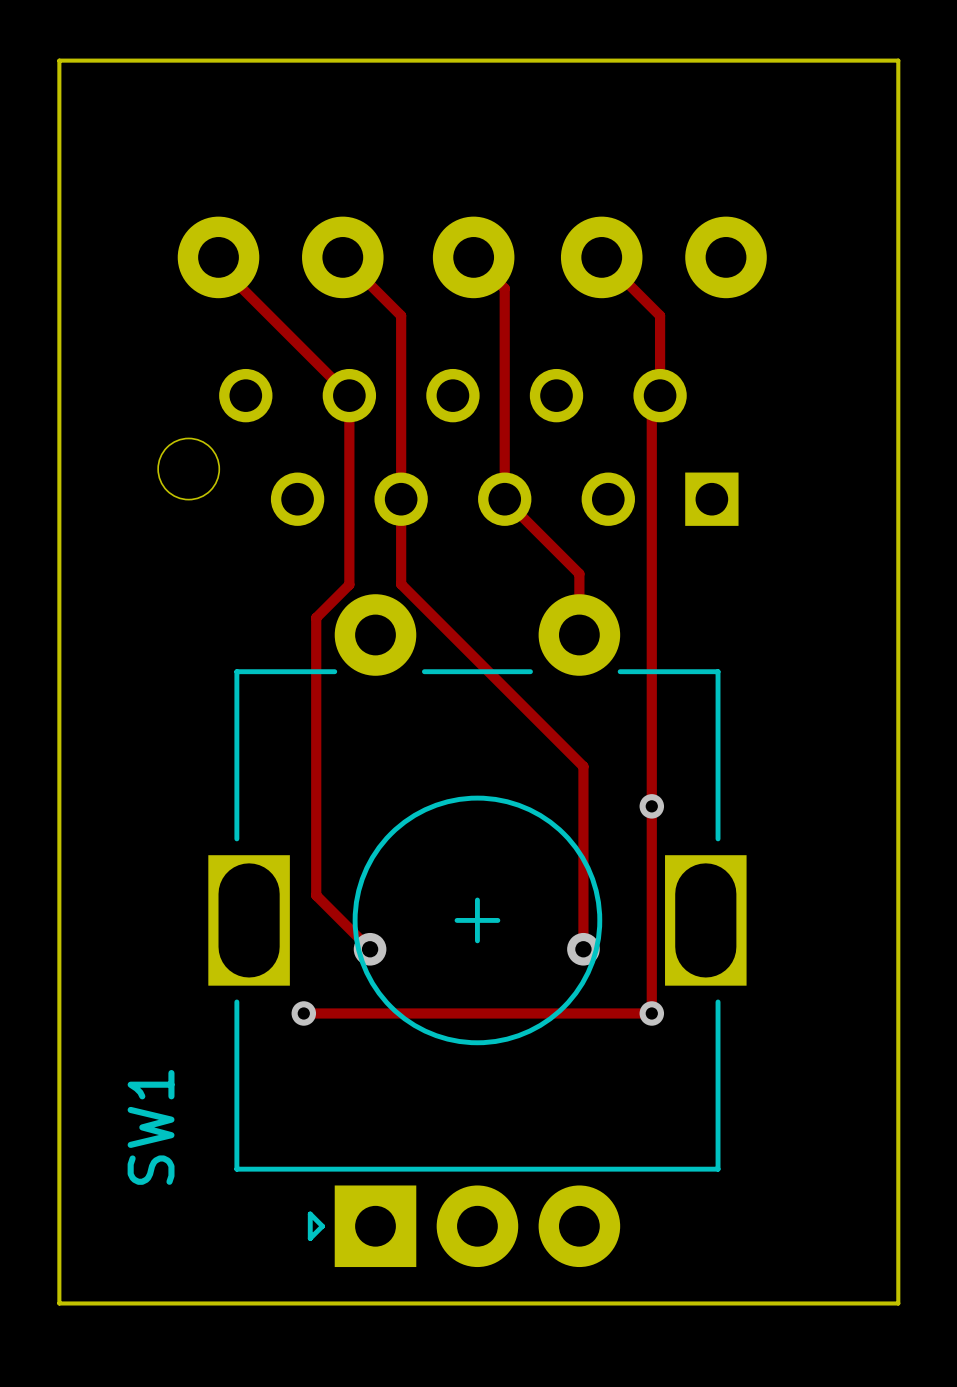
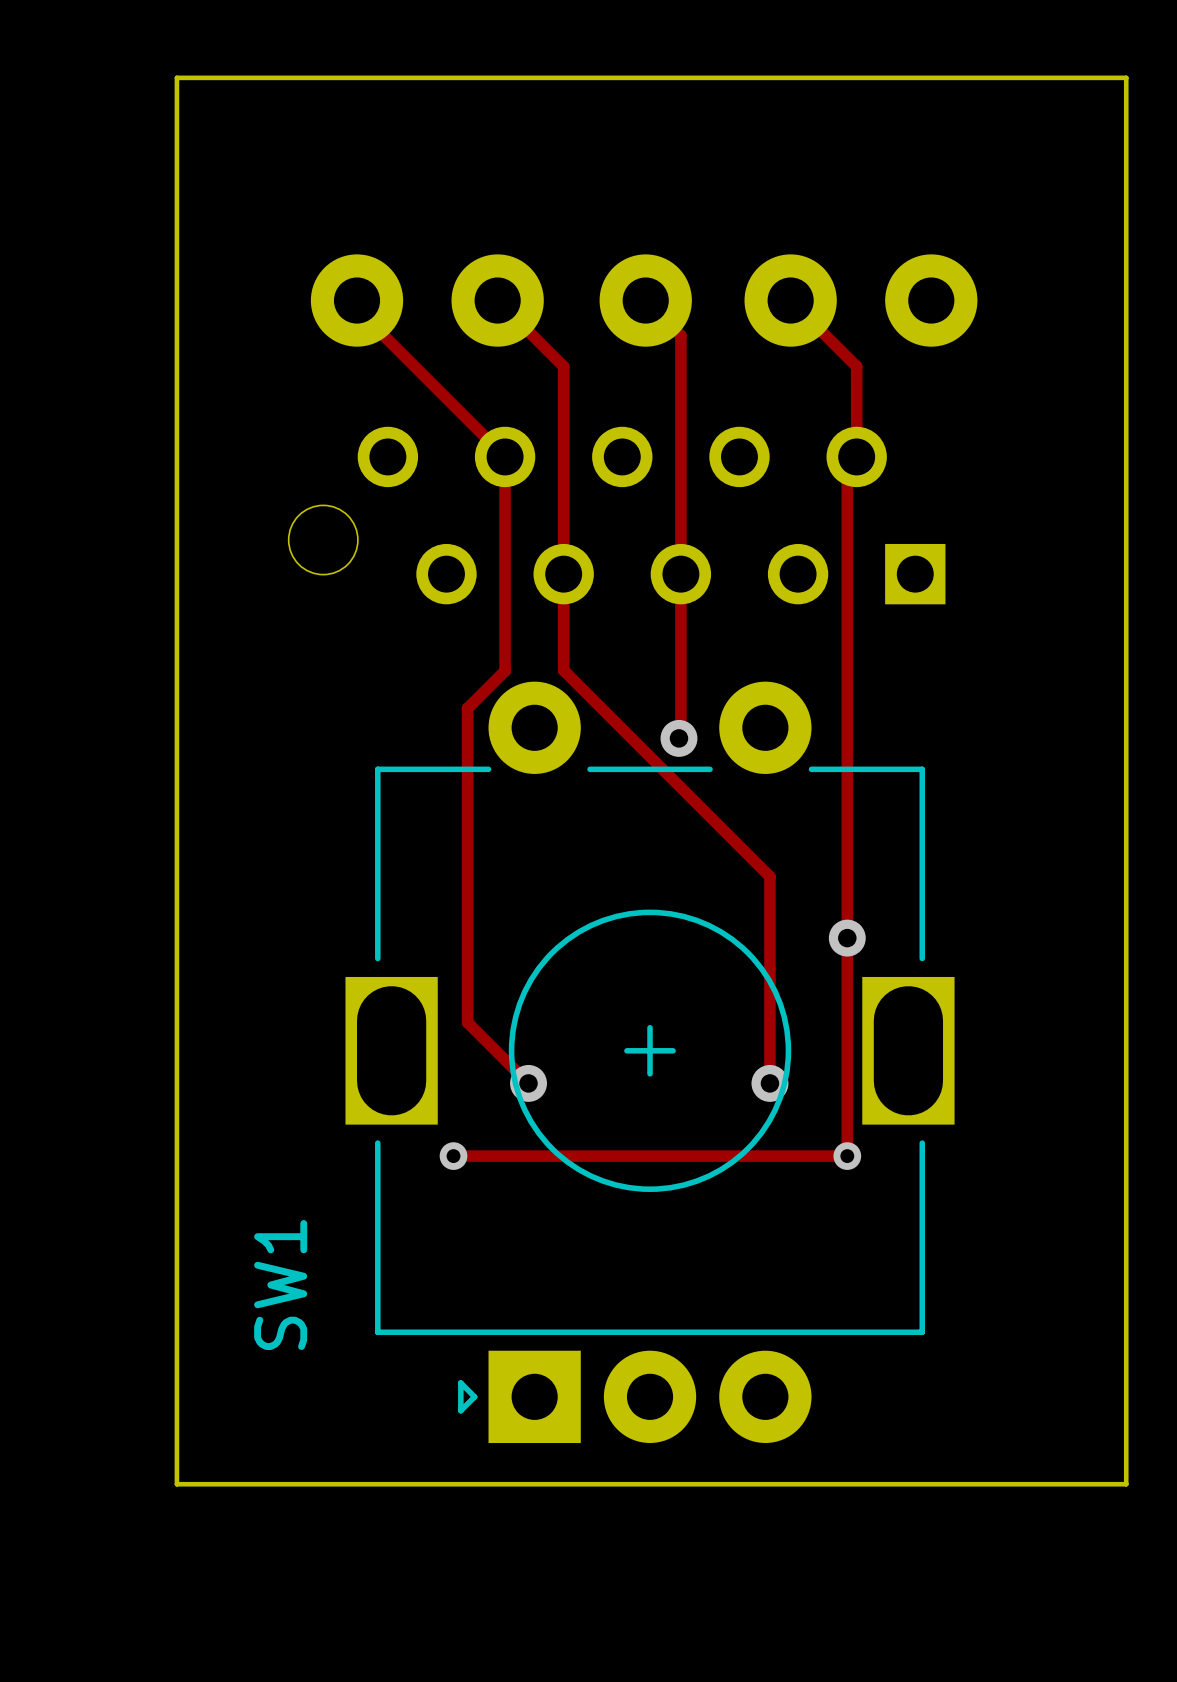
track: (504, 499) (579, 573) (579, 634) -> (680, 574) (680, 736) (678, 738)
via: none -> (678, 738)
via size: [639, 794, 665, 819] -> [828, 919, 866, 957]

